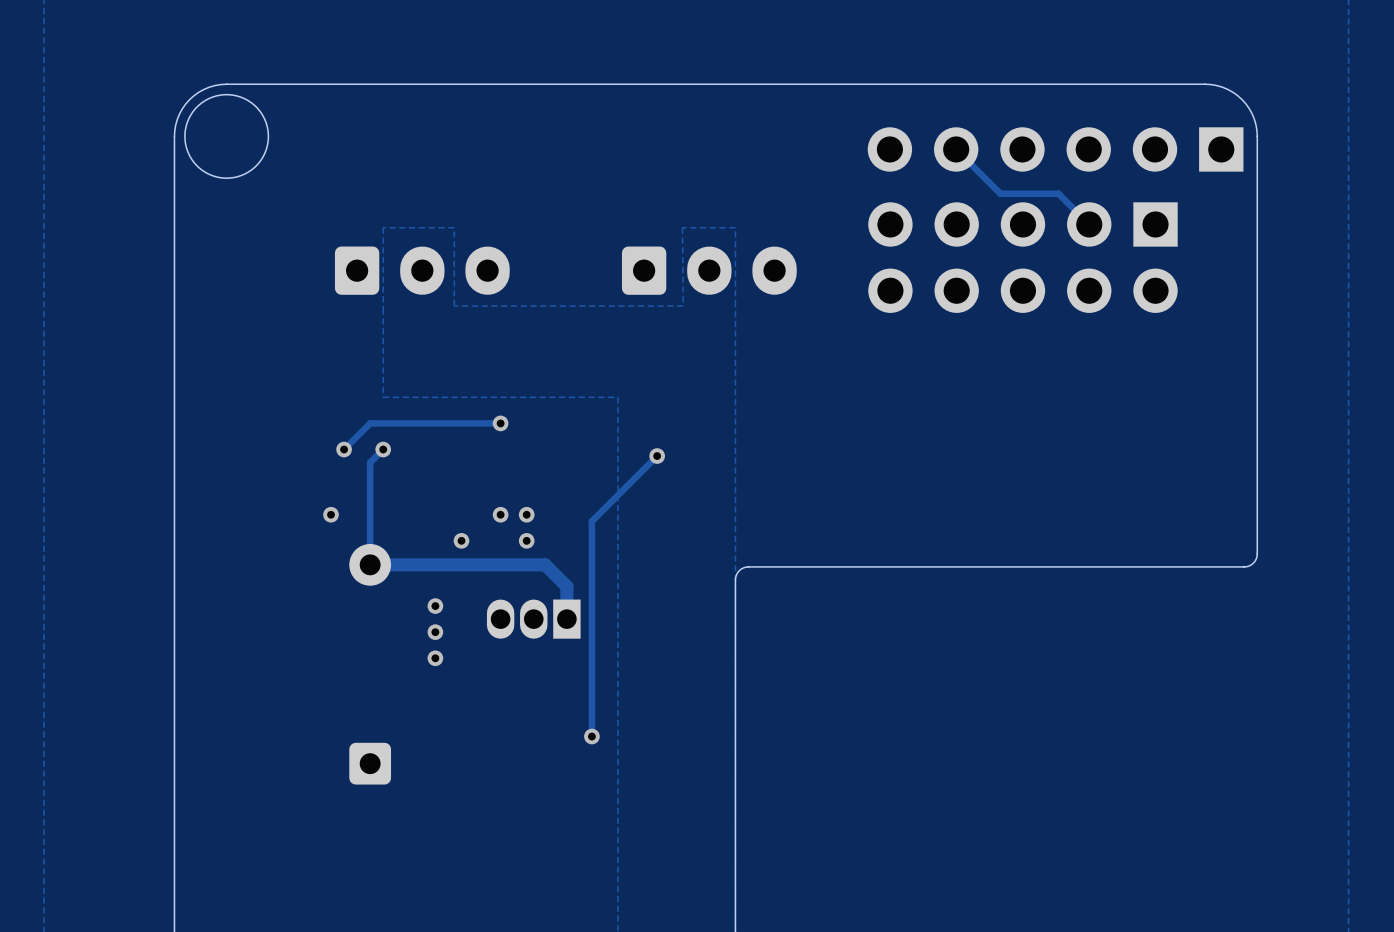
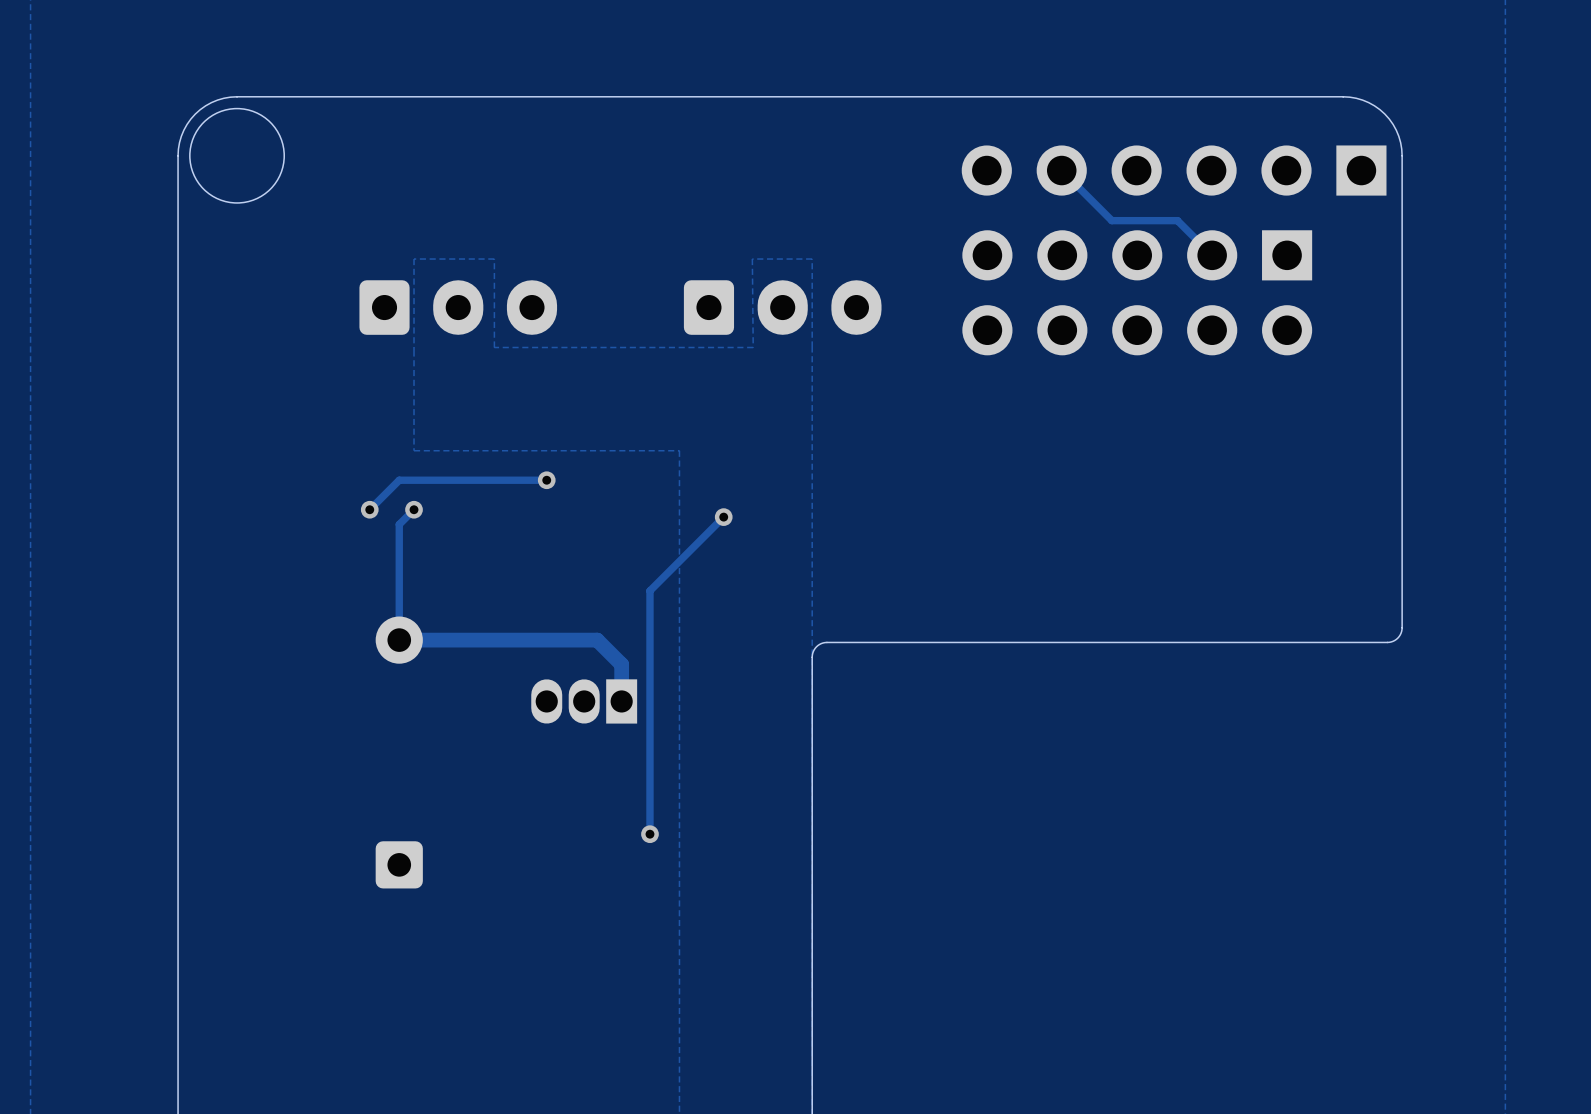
via: (331, 514) -> none
via: (500, 514) -> none
via: (526, 514) -> none
via: (461, 540) -> none
via: (526, 540) -> none
via: (435, 606) -> none
via: (435, 632) -> none
via: (435, 658) -> none

